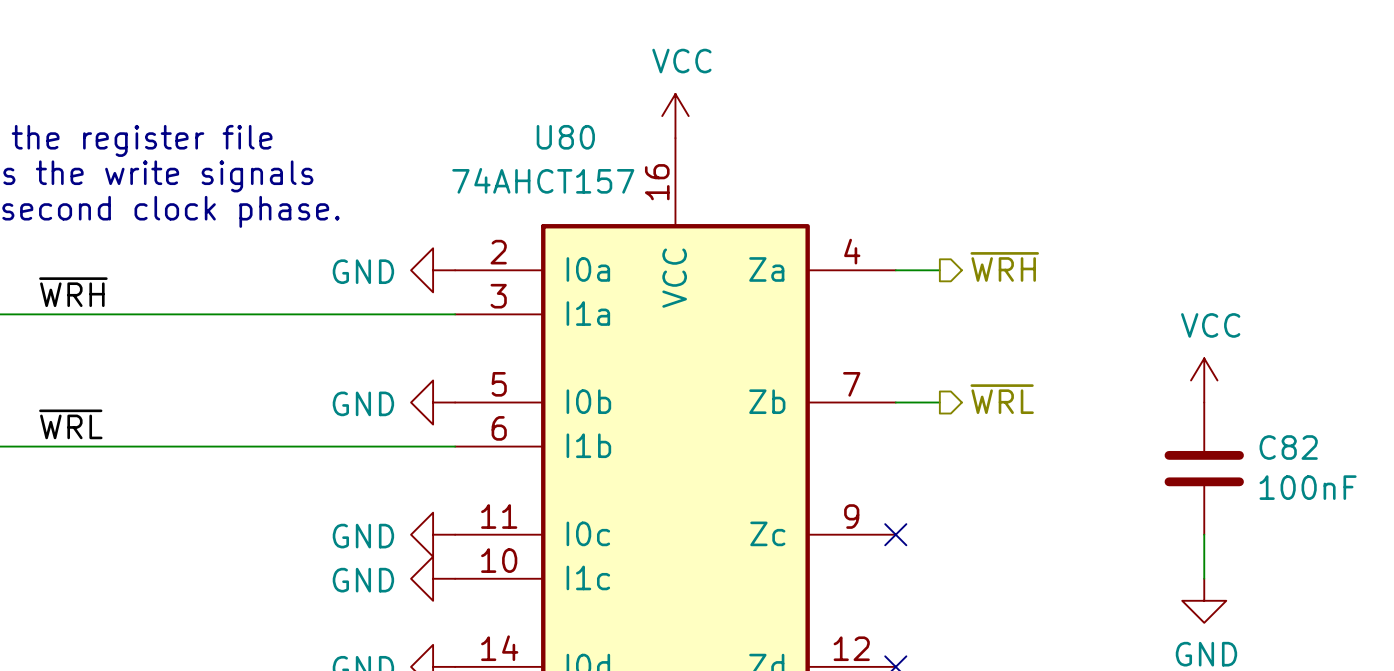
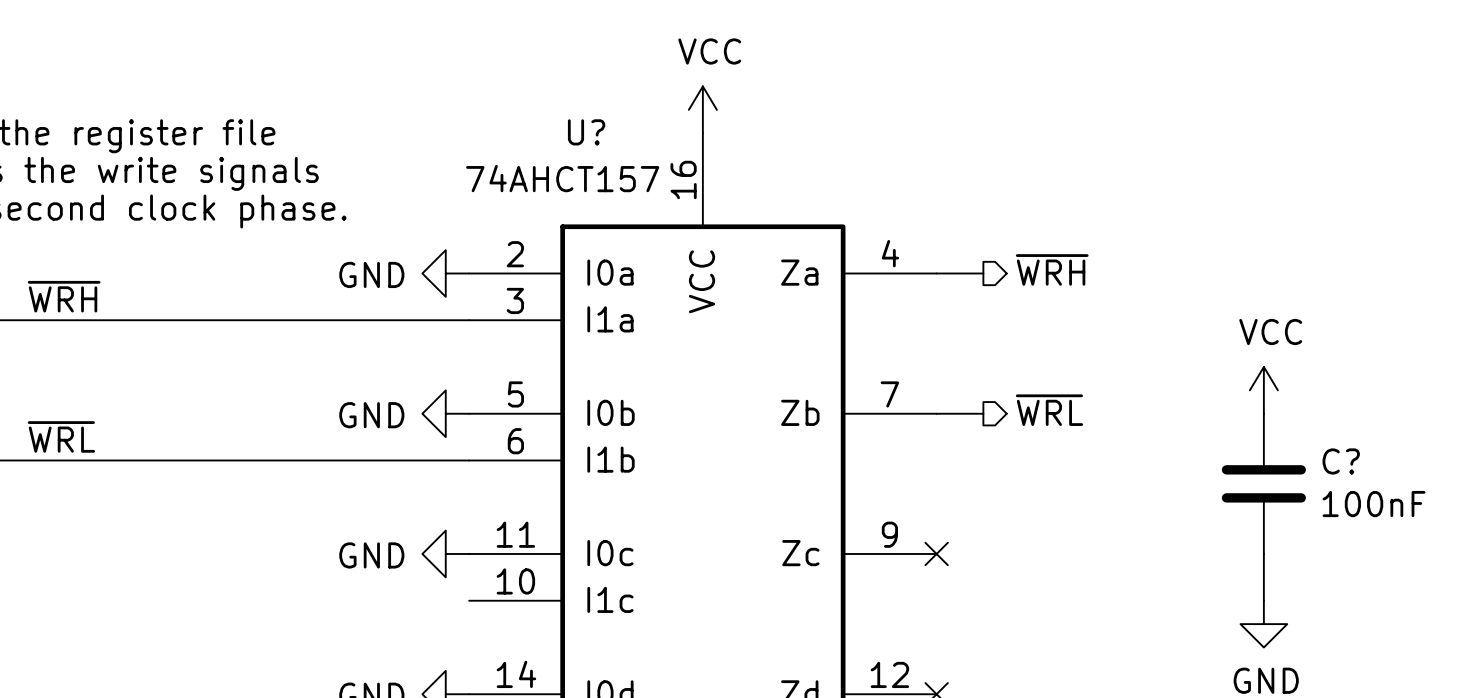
U80 name: U80 (565, 137) -> U? (586, 132)
C82 name: C82 (1288, 447) -> C? (1341, 461)
power symbol: GND (433, 578) -> none

